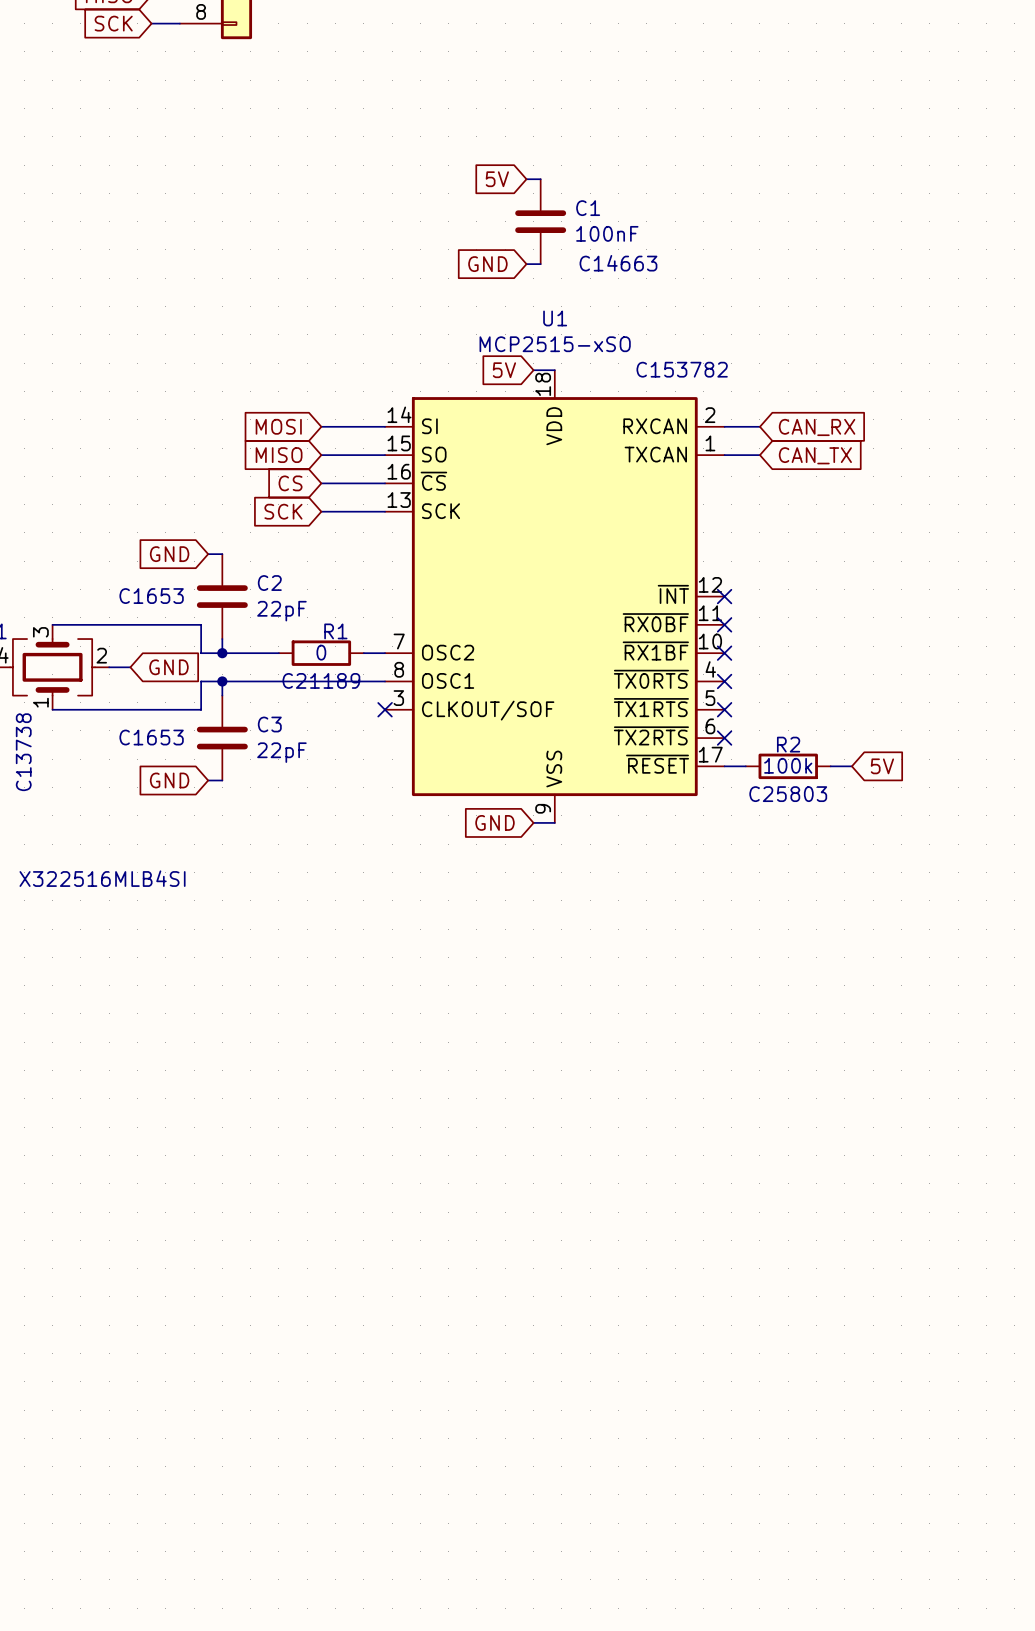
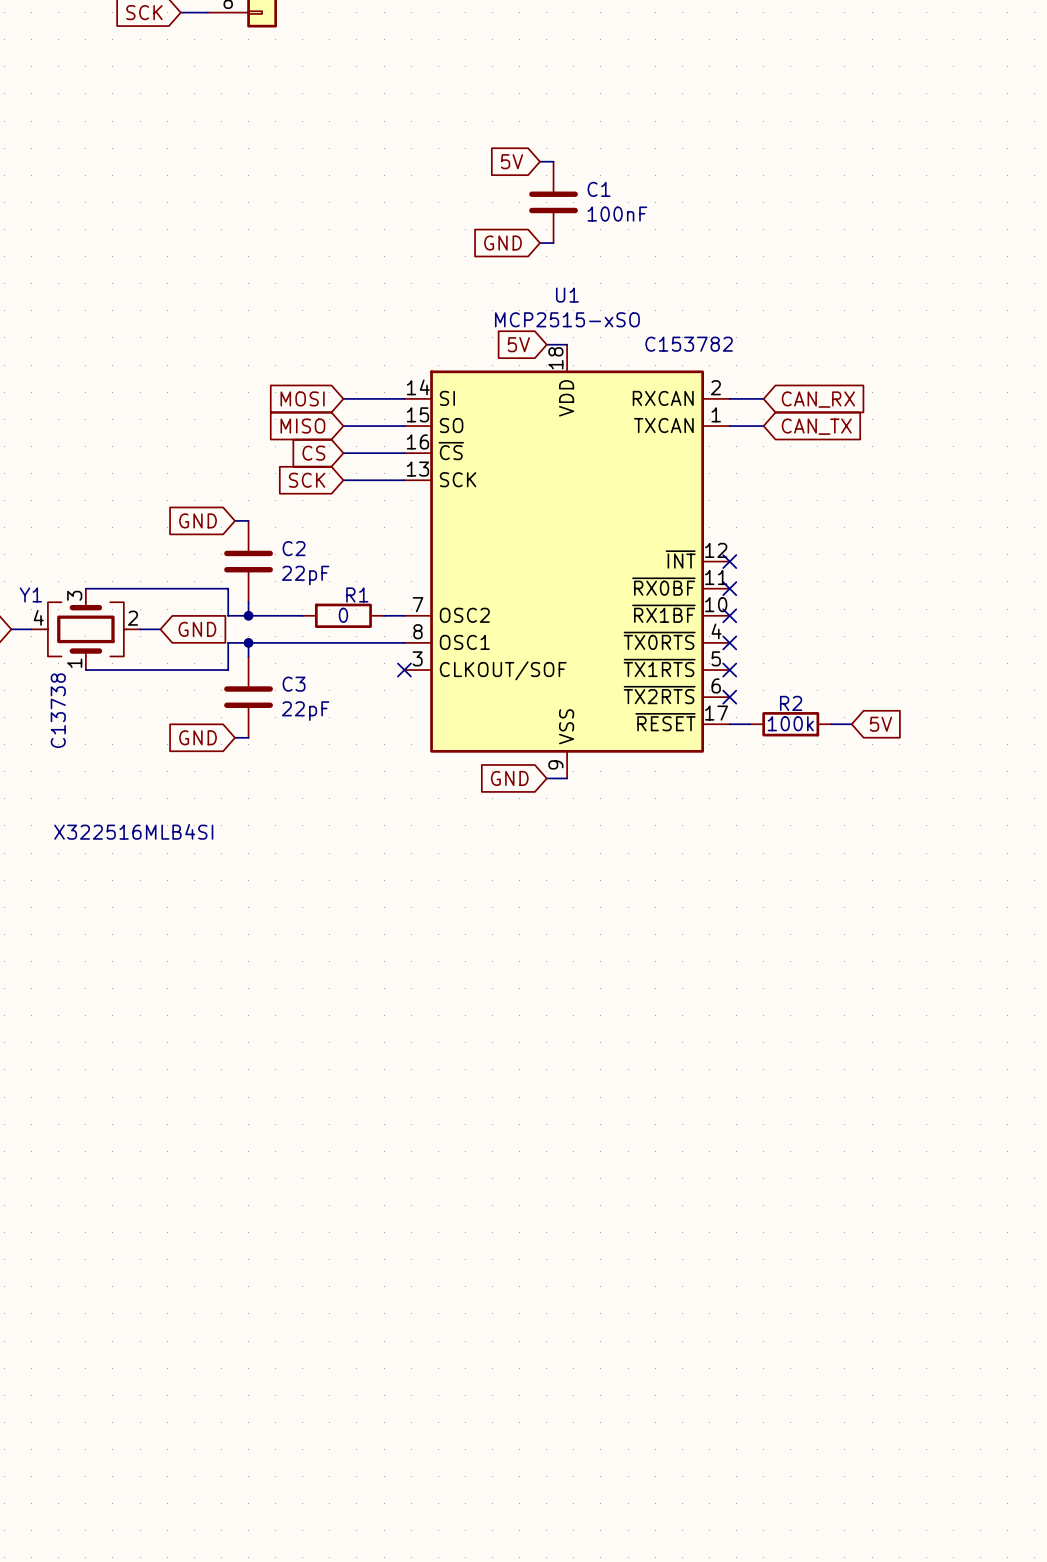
C1 text: C14663 (618, 263) -> none
C2 text: C1653 (151, 596) -> none
R1 text: C21189 (321, 680) -> none
C3 text: C1653 (151, 737) -> none
R2 text: C25803 (788, 794) -> none

